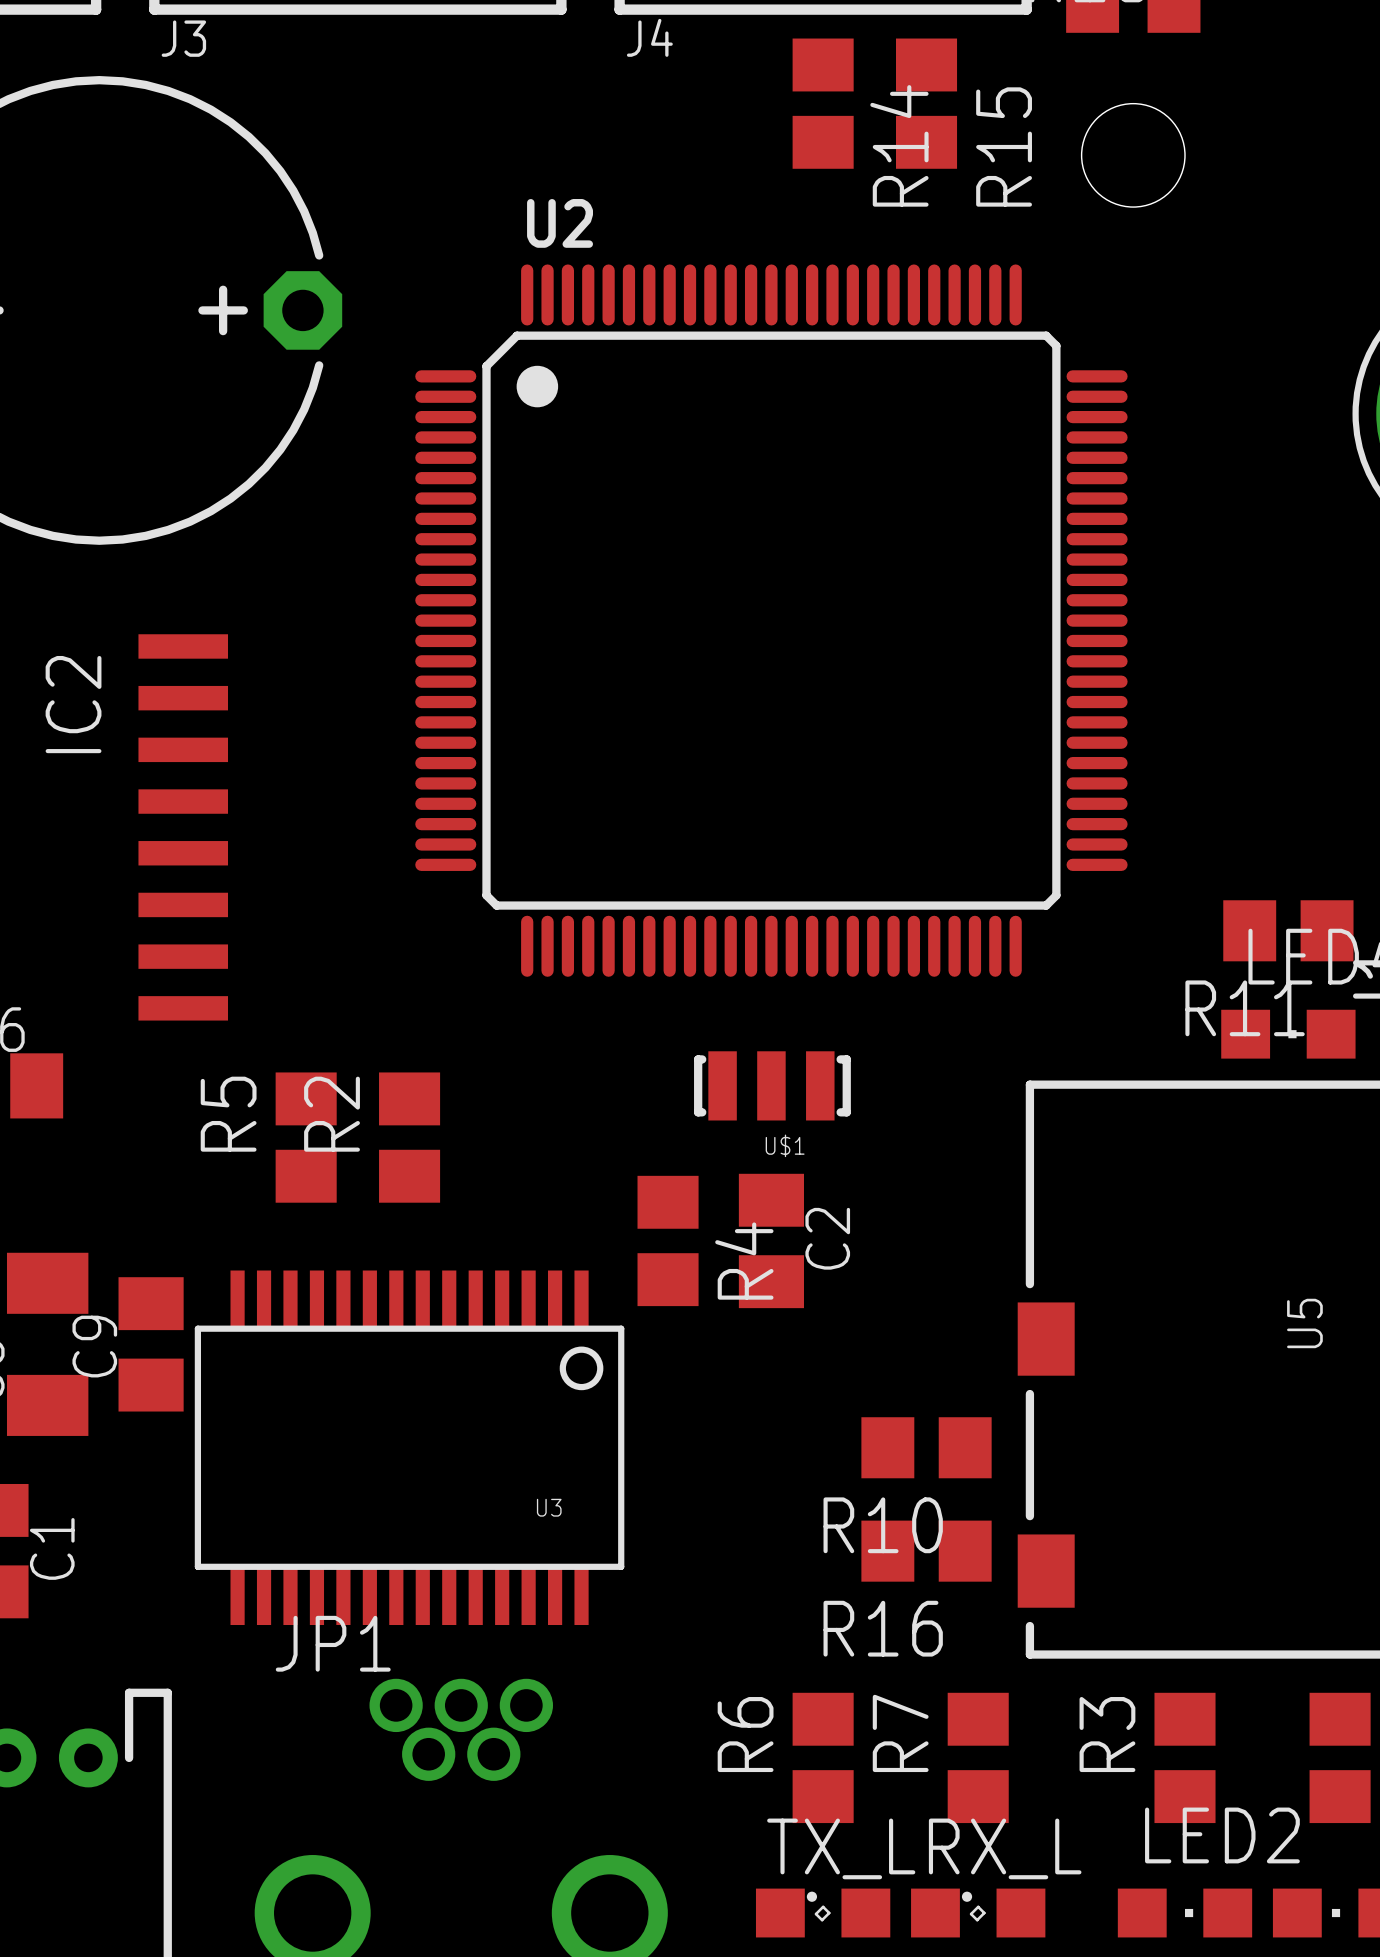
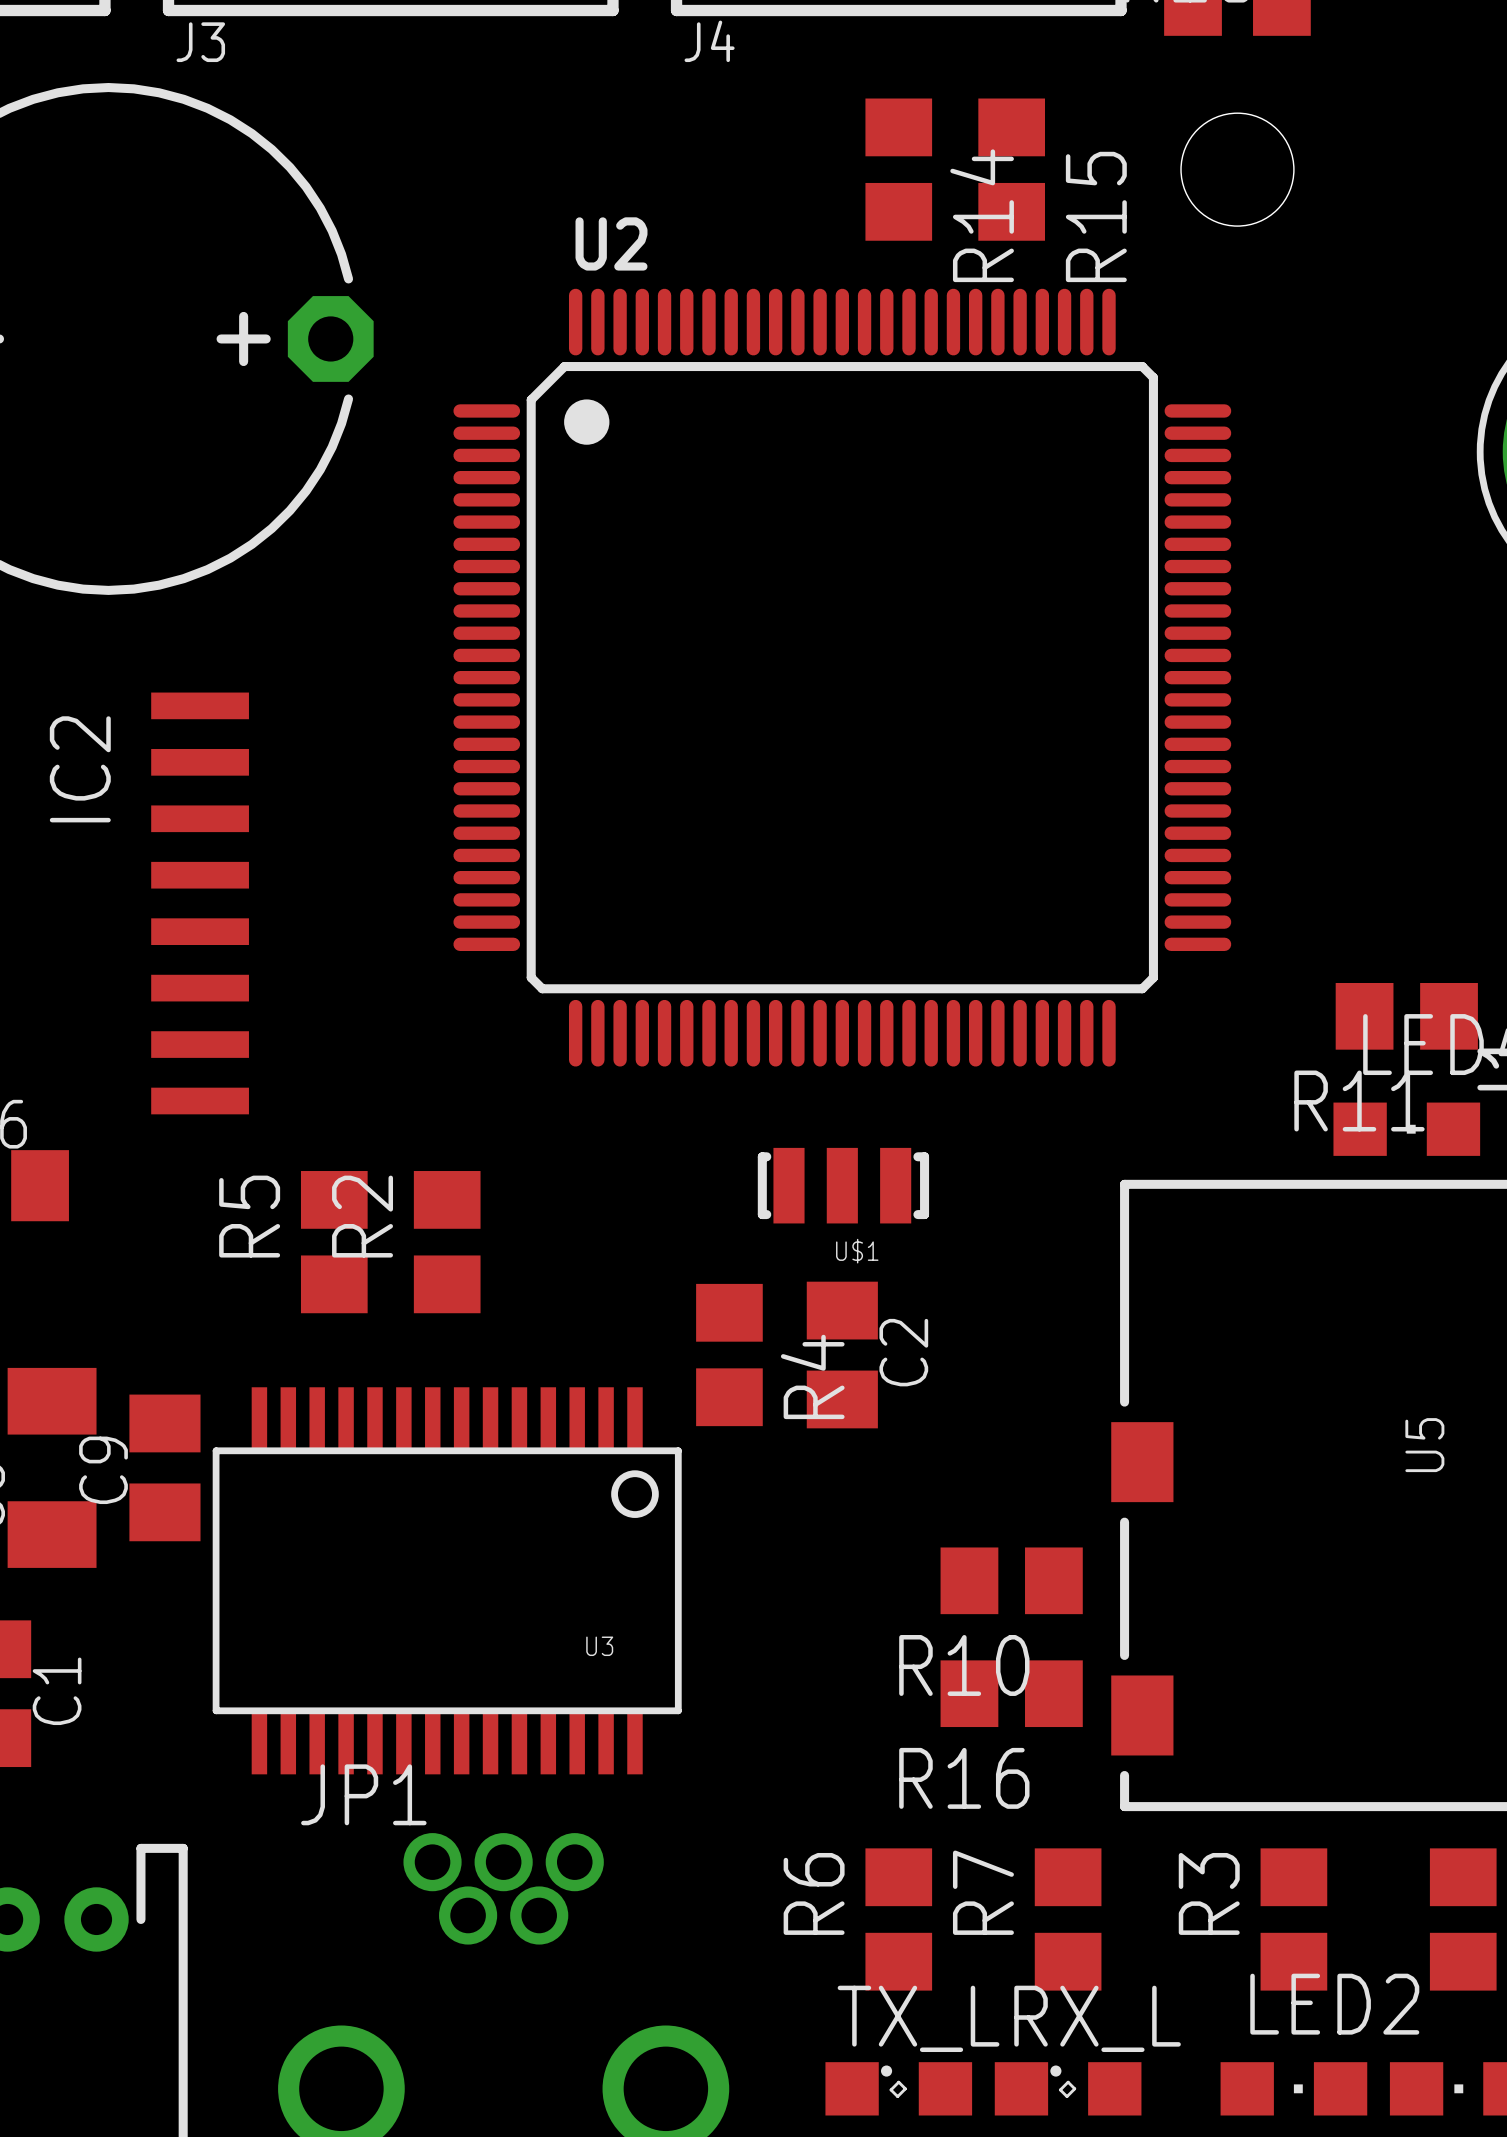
R14 position: (823, 103) -> (898, 169)
R15 position: (926, 103) -> (1011, 169)

